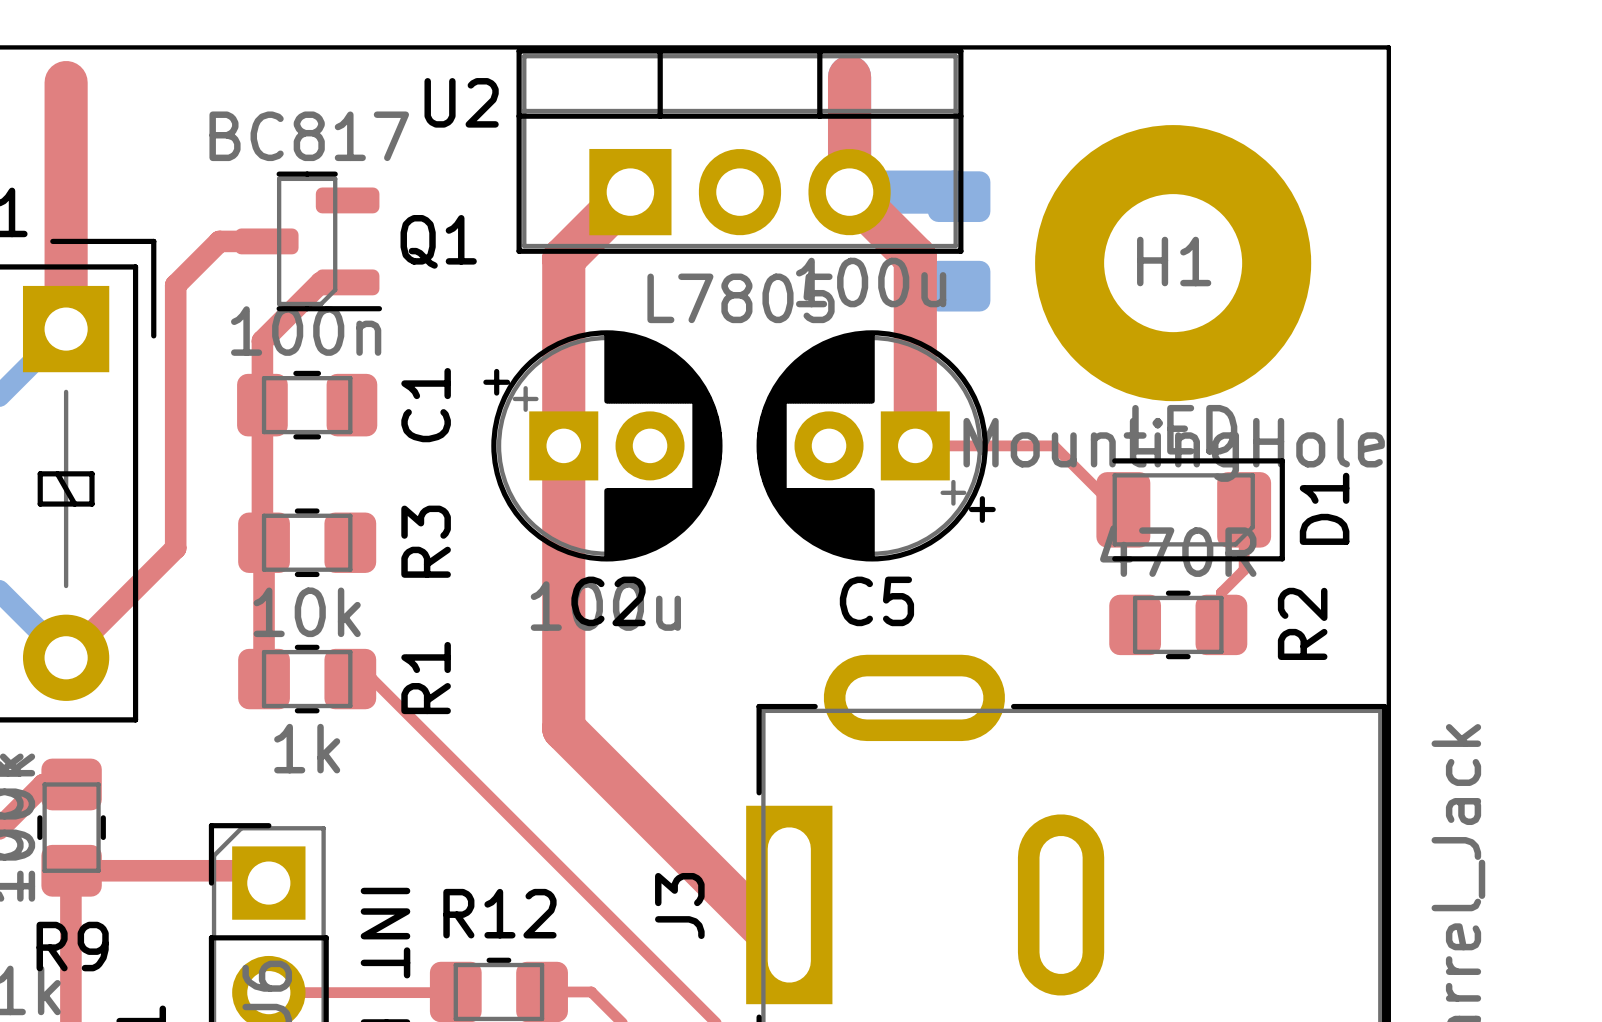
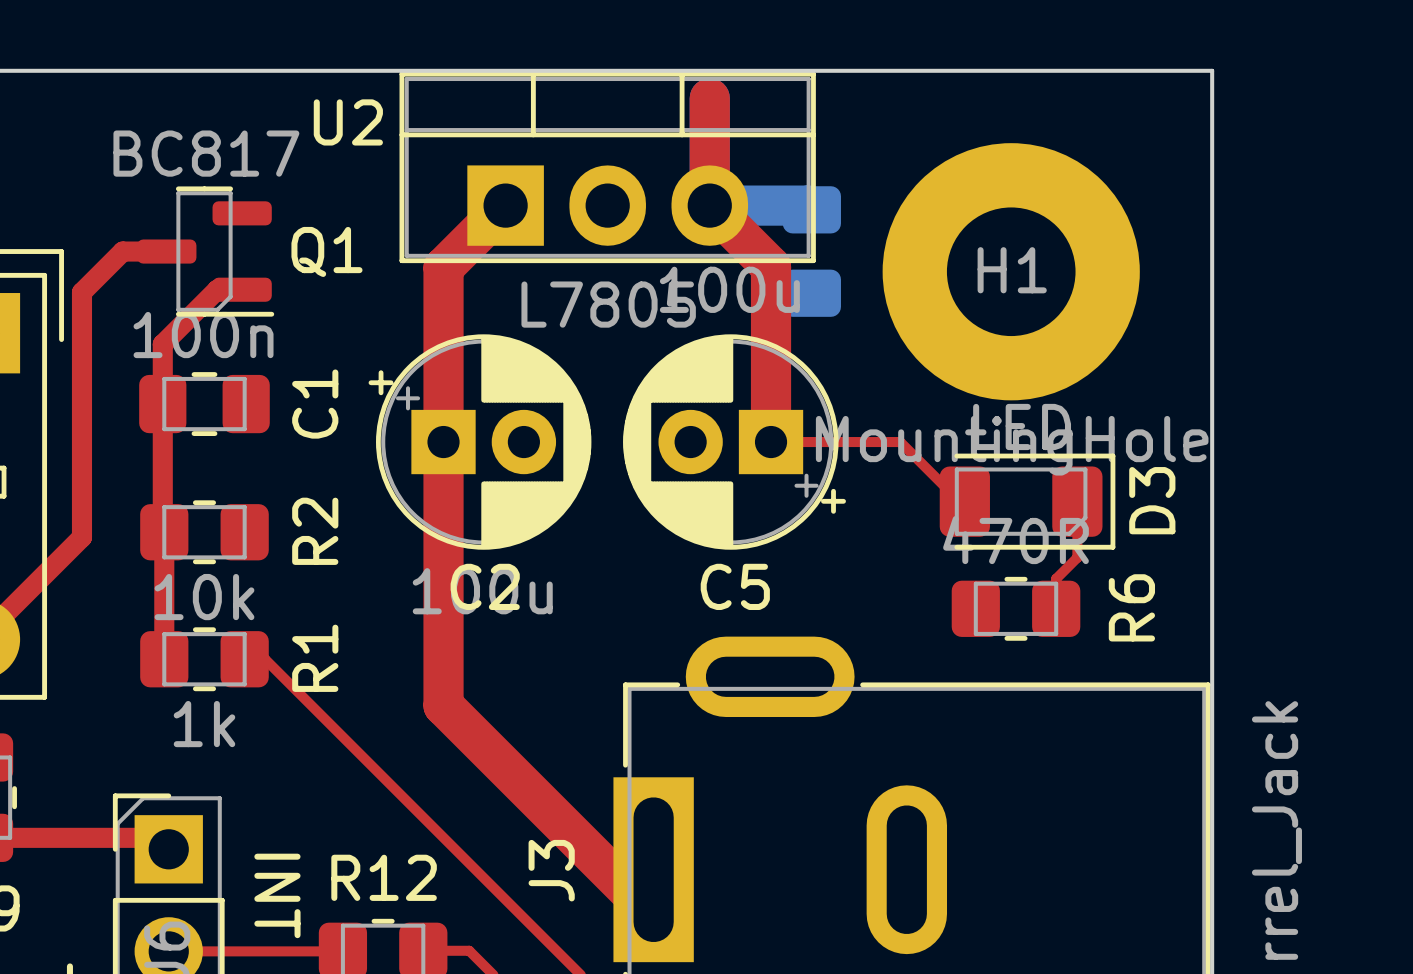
D1 name: D1 (1324, 508) -> D3 (1152, 500)
R3 name: R3 (426, 541) -> R2 (315, 531)
R2 name: R2 (1302, 623) -> R6 (1131, 607)

